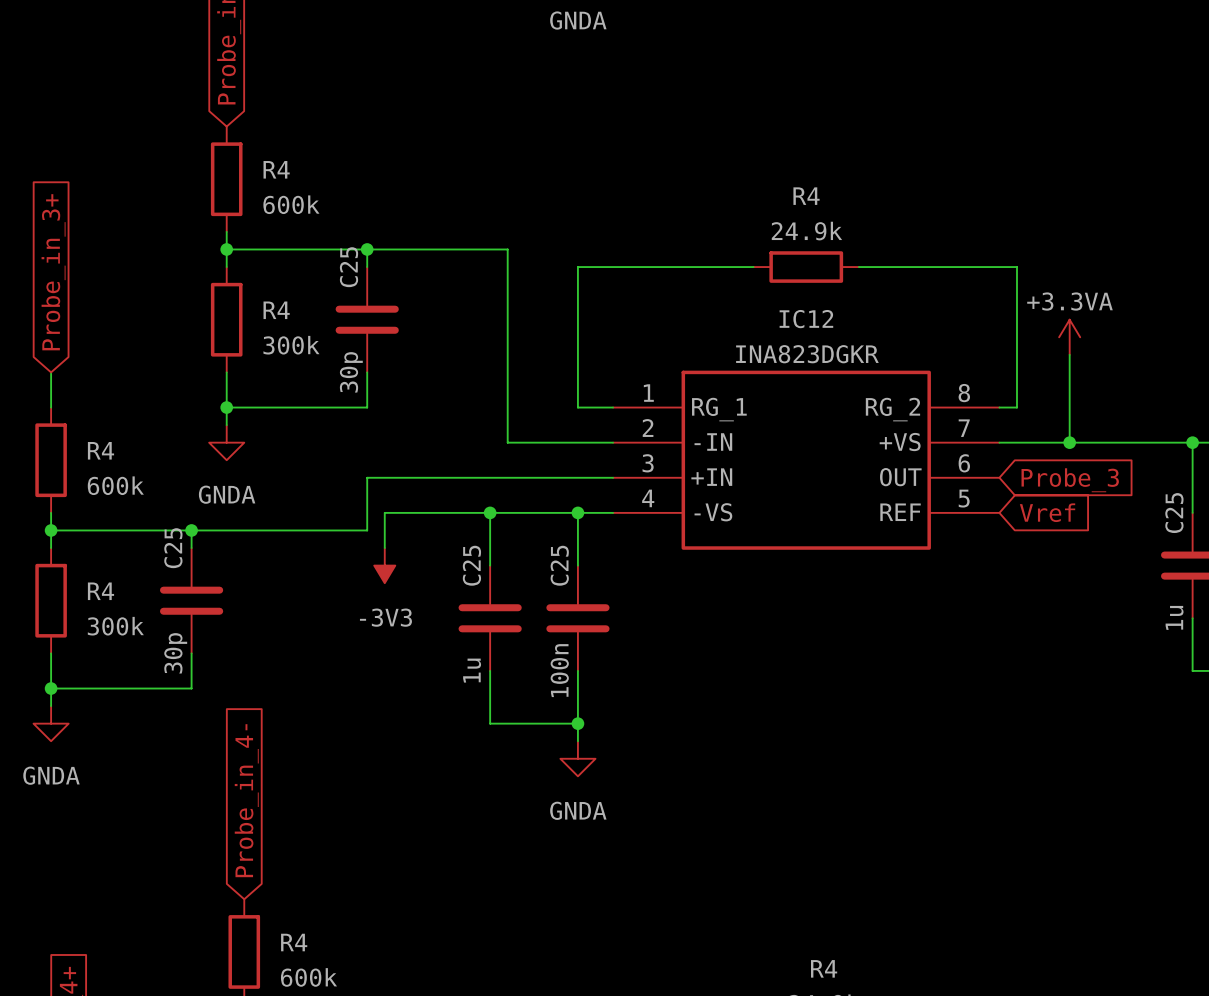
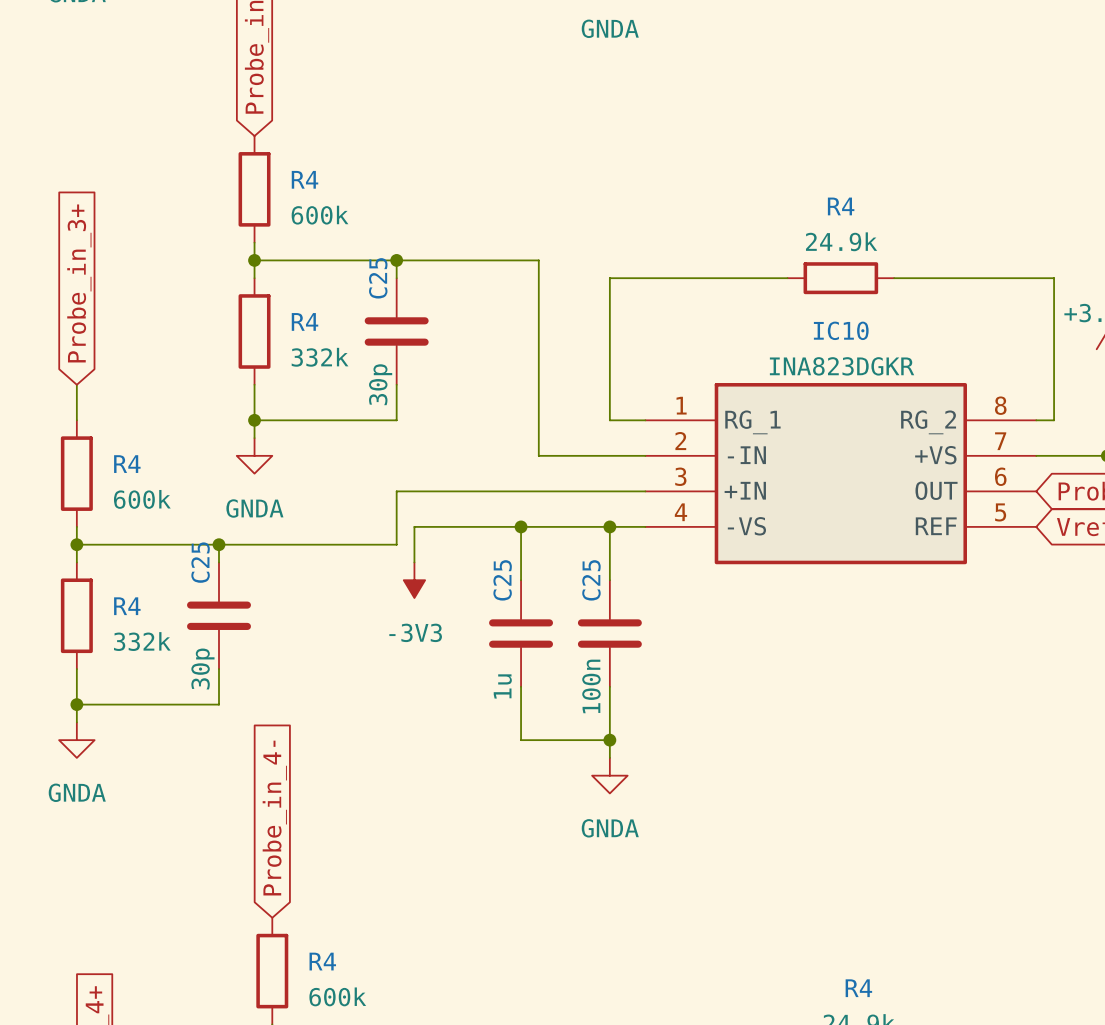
IC12 name: IC12 (806, 319) -> IC10 (841, 330)
R4 value: 300k (291, 345) -> 332k (320, 357)
R4 value: 300k (115, 626) -> 332k (142, 641)

